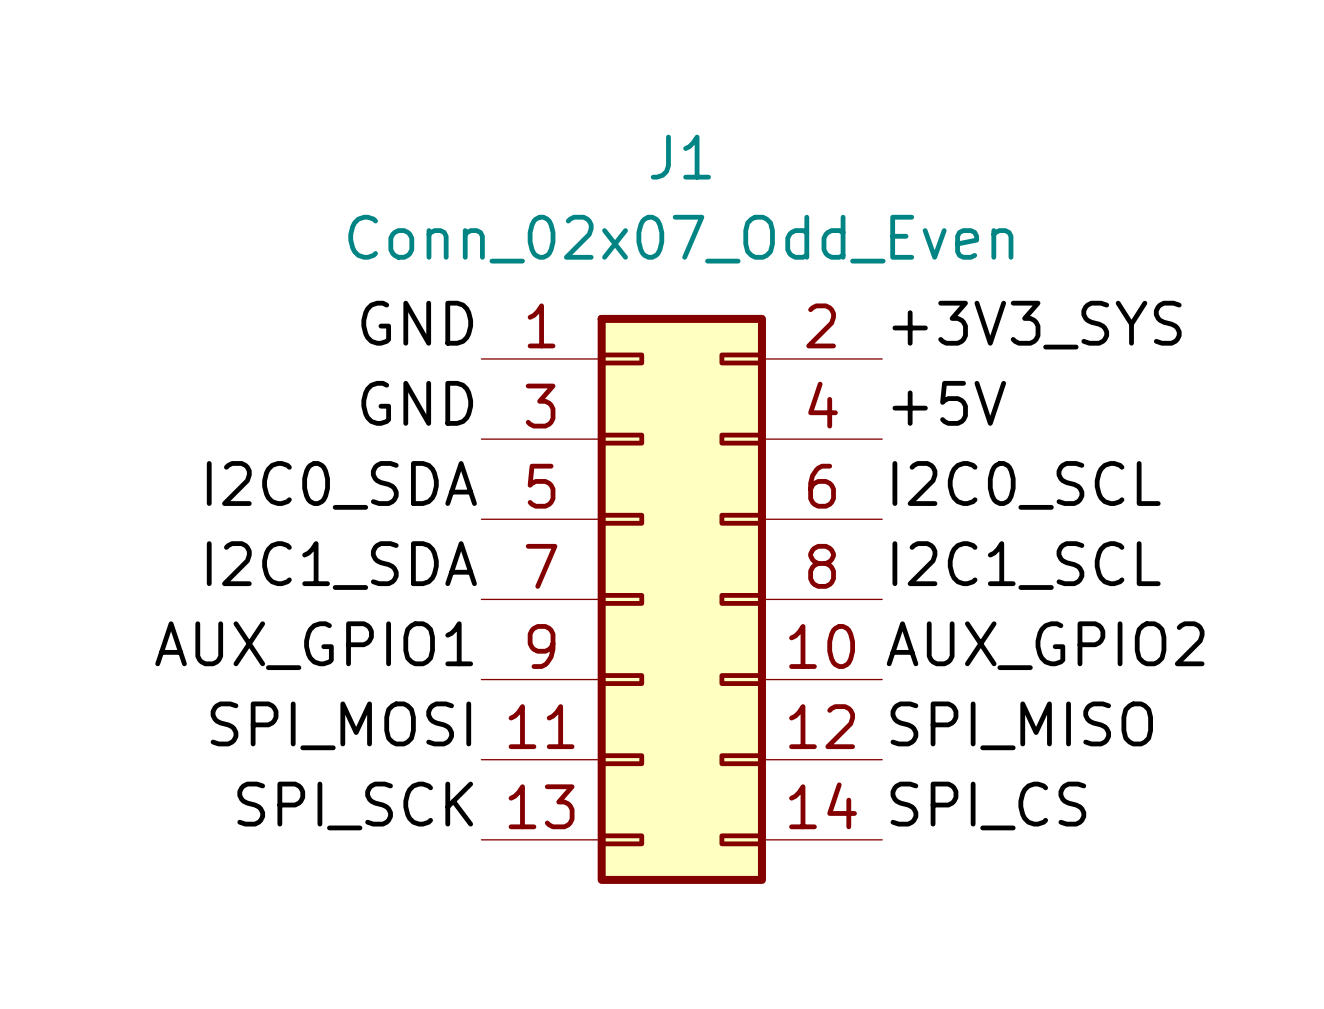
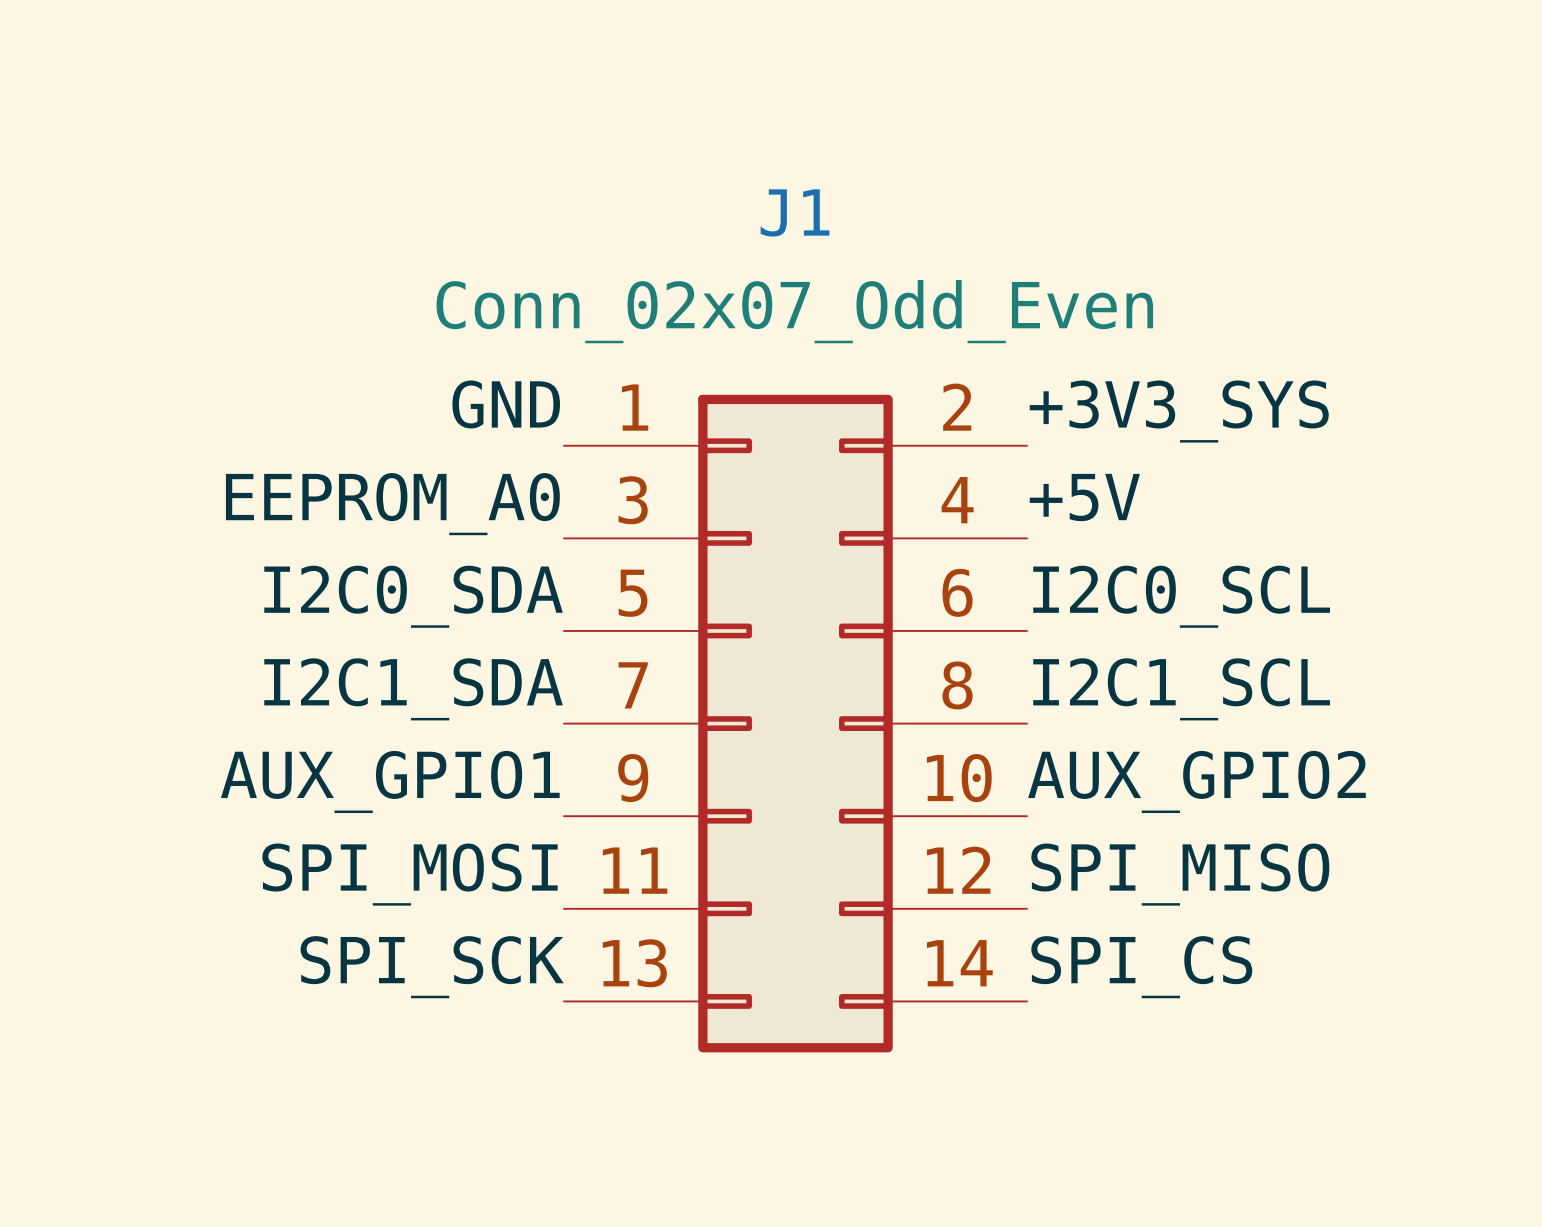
label: GND (417, 403) -> EEPROM_A0 (392, 504)

